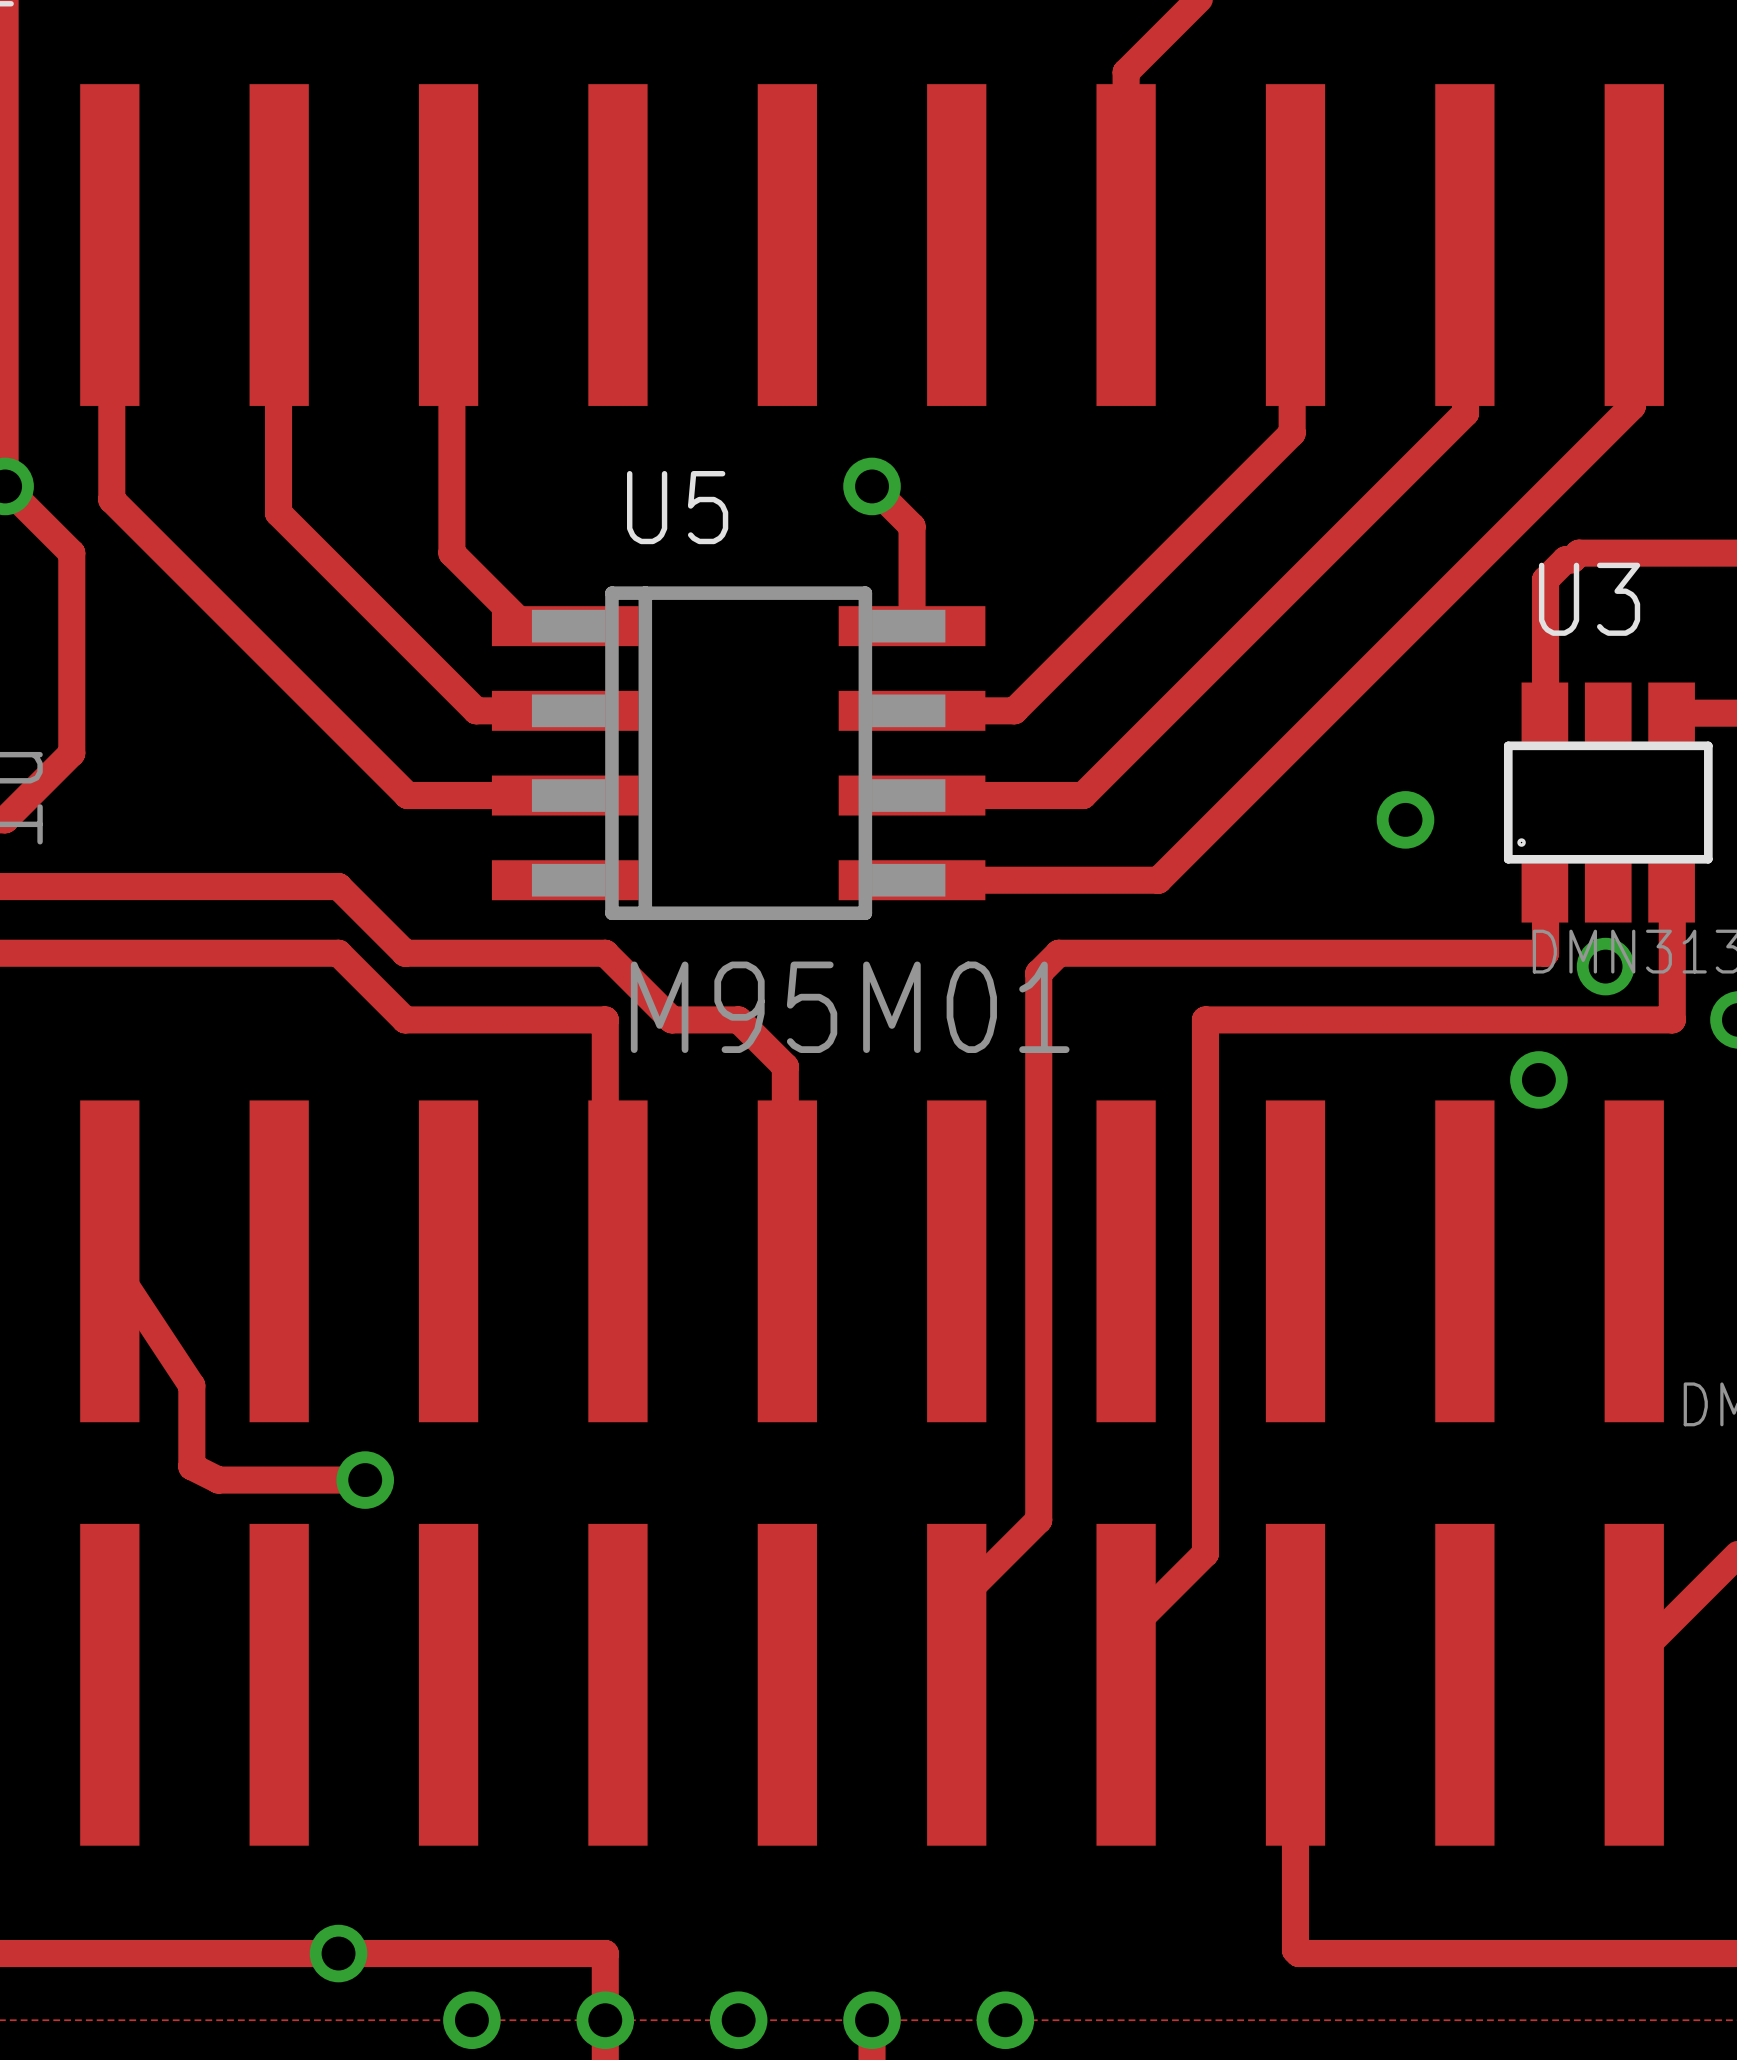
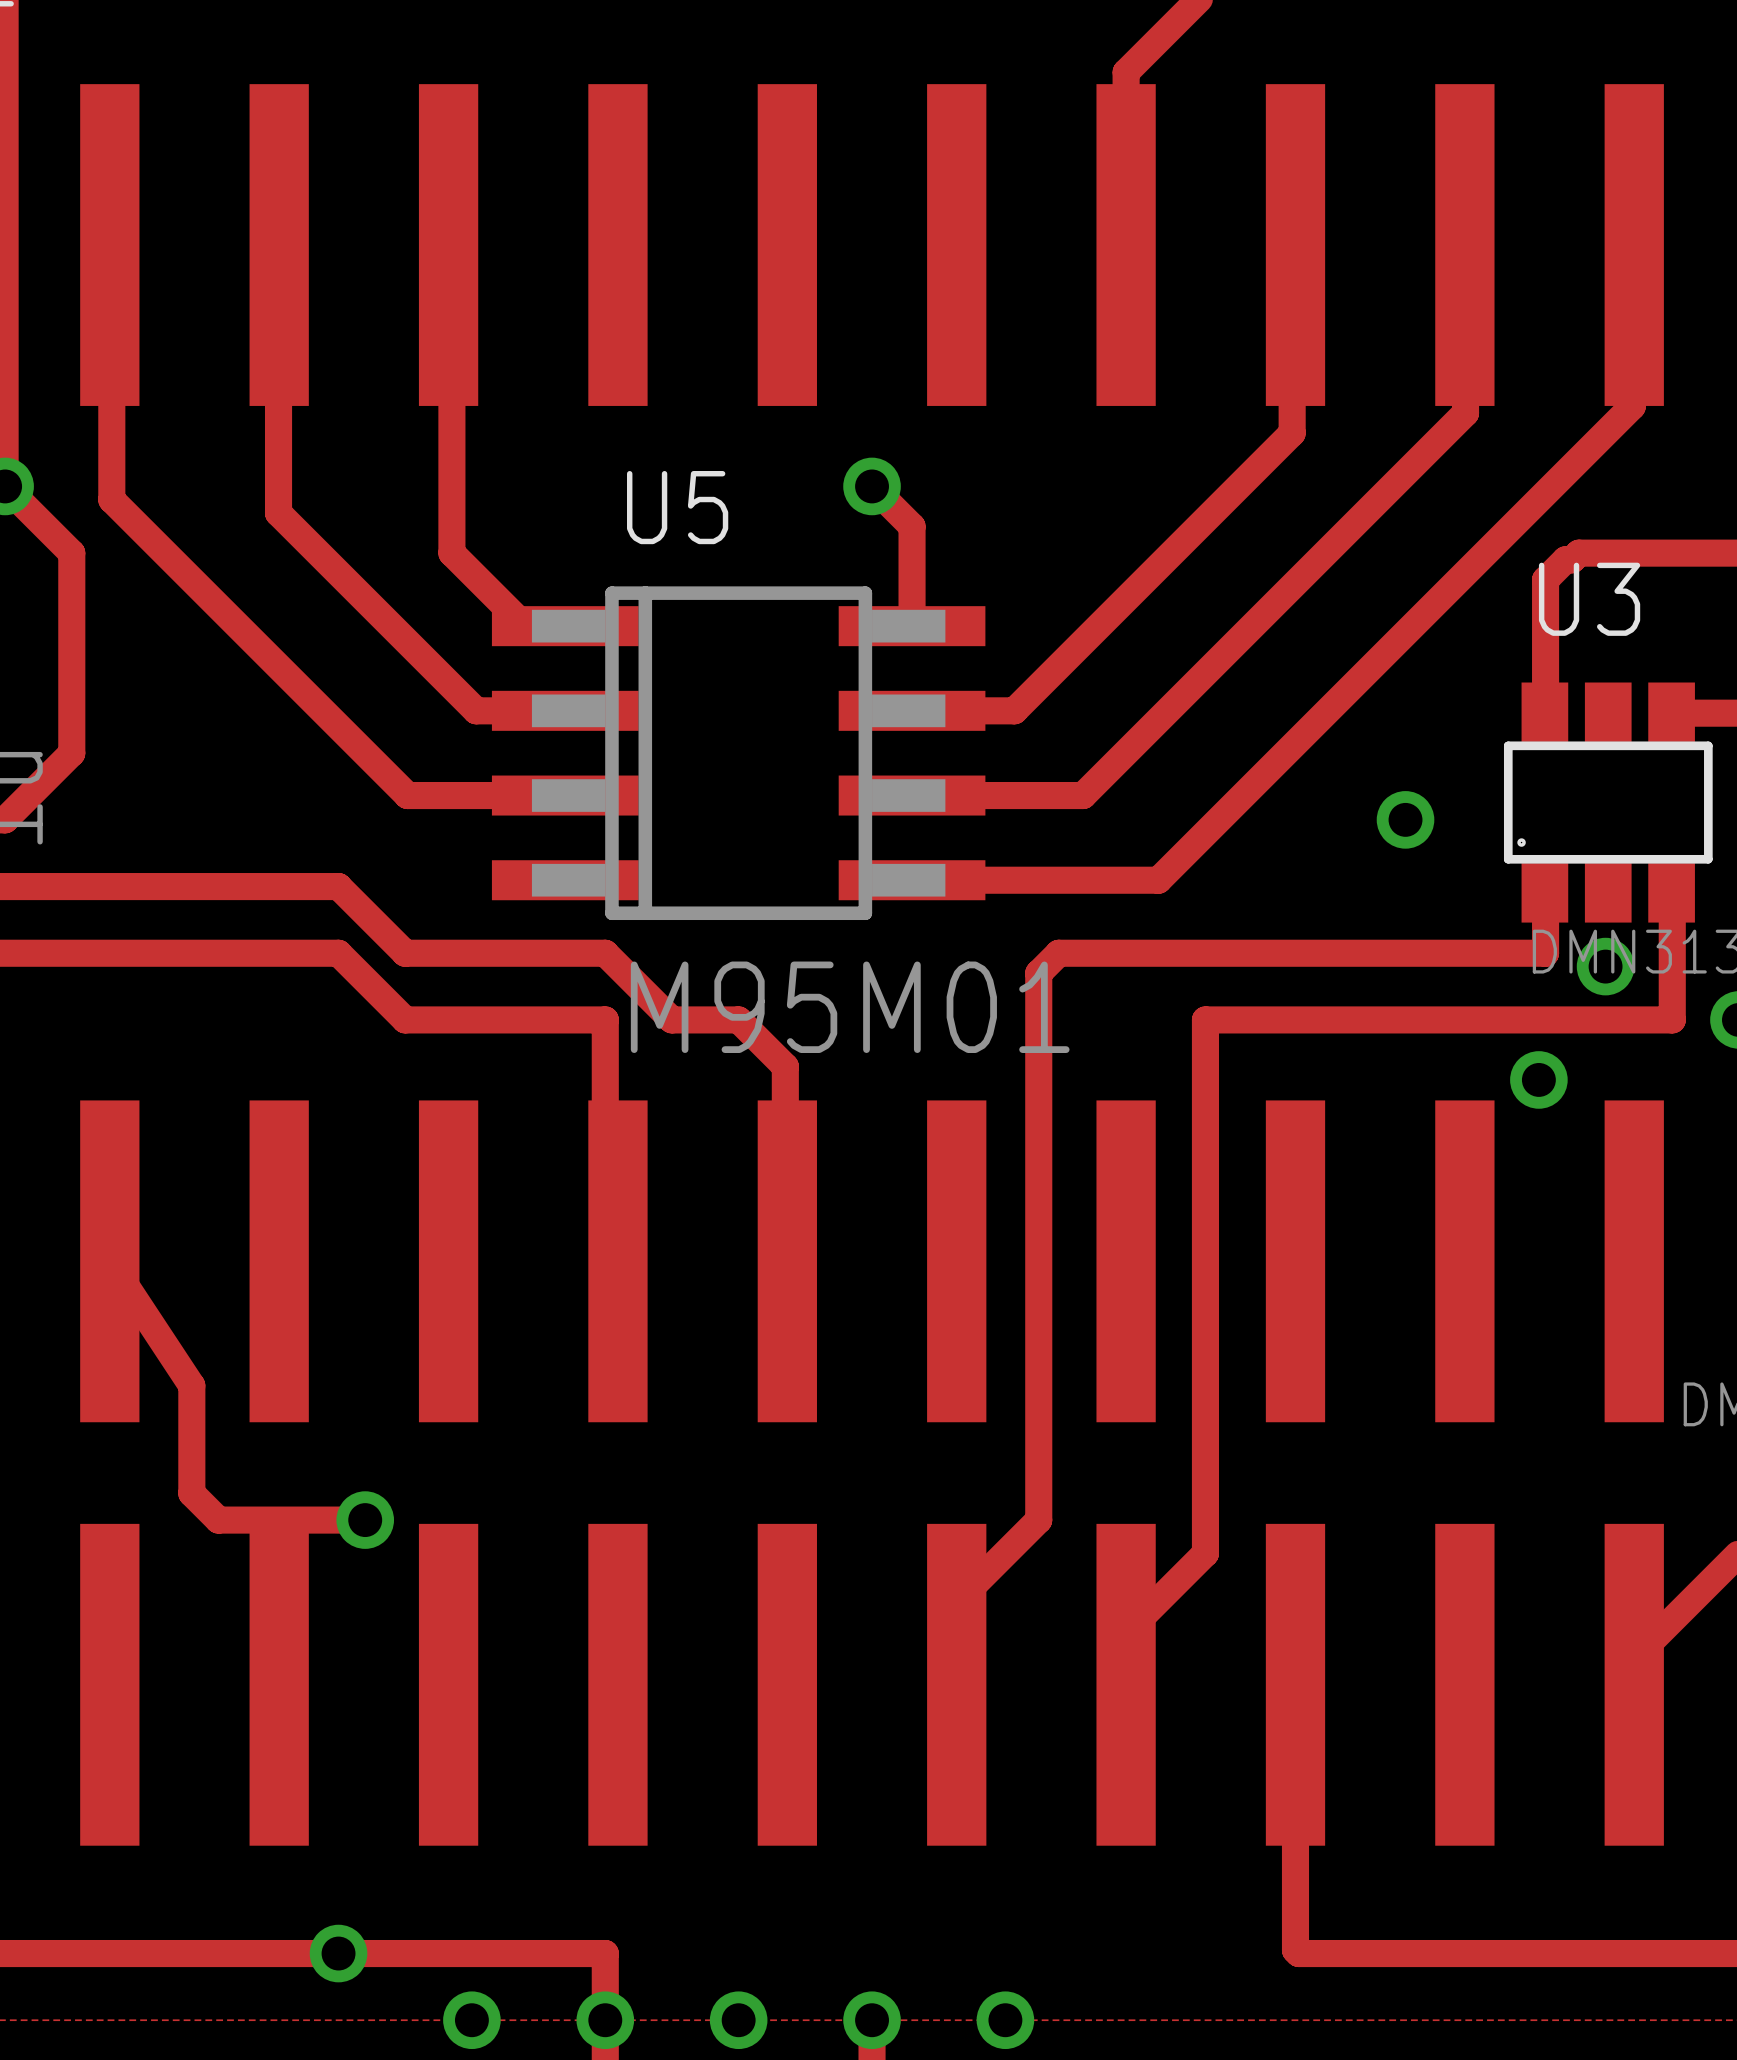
track: (191, 1466) (218, 1480) (365, 1480) -> (191, 1466) (191, 1493) (218, 1520) (365, 1520)
via position: (365, 1480) -> (365, 1520)

